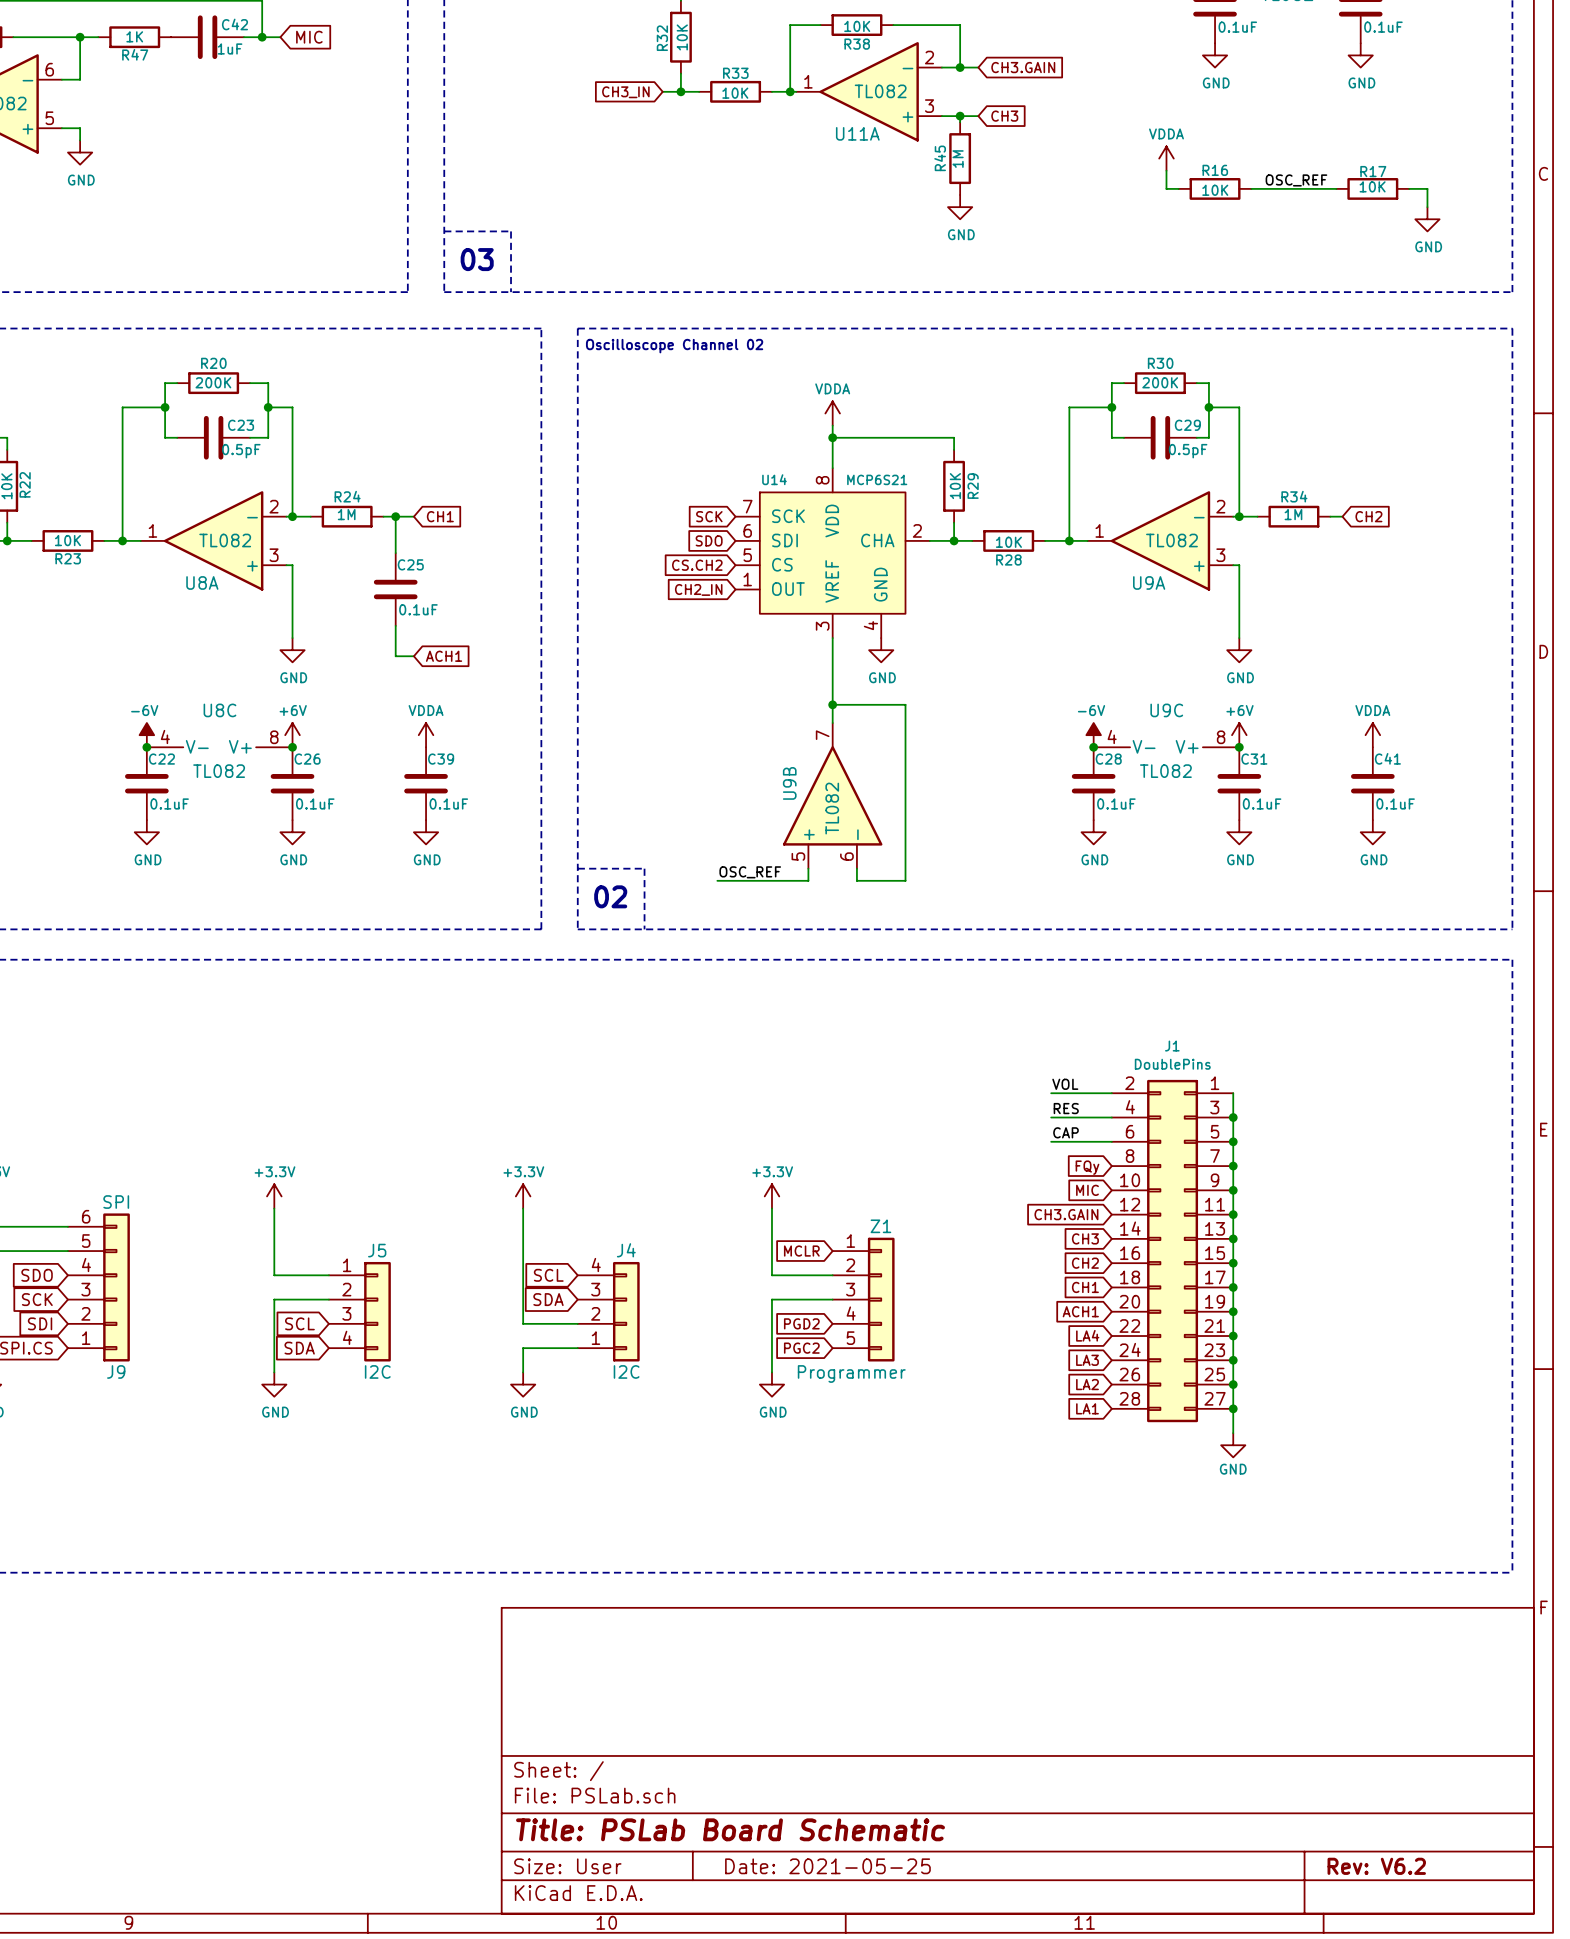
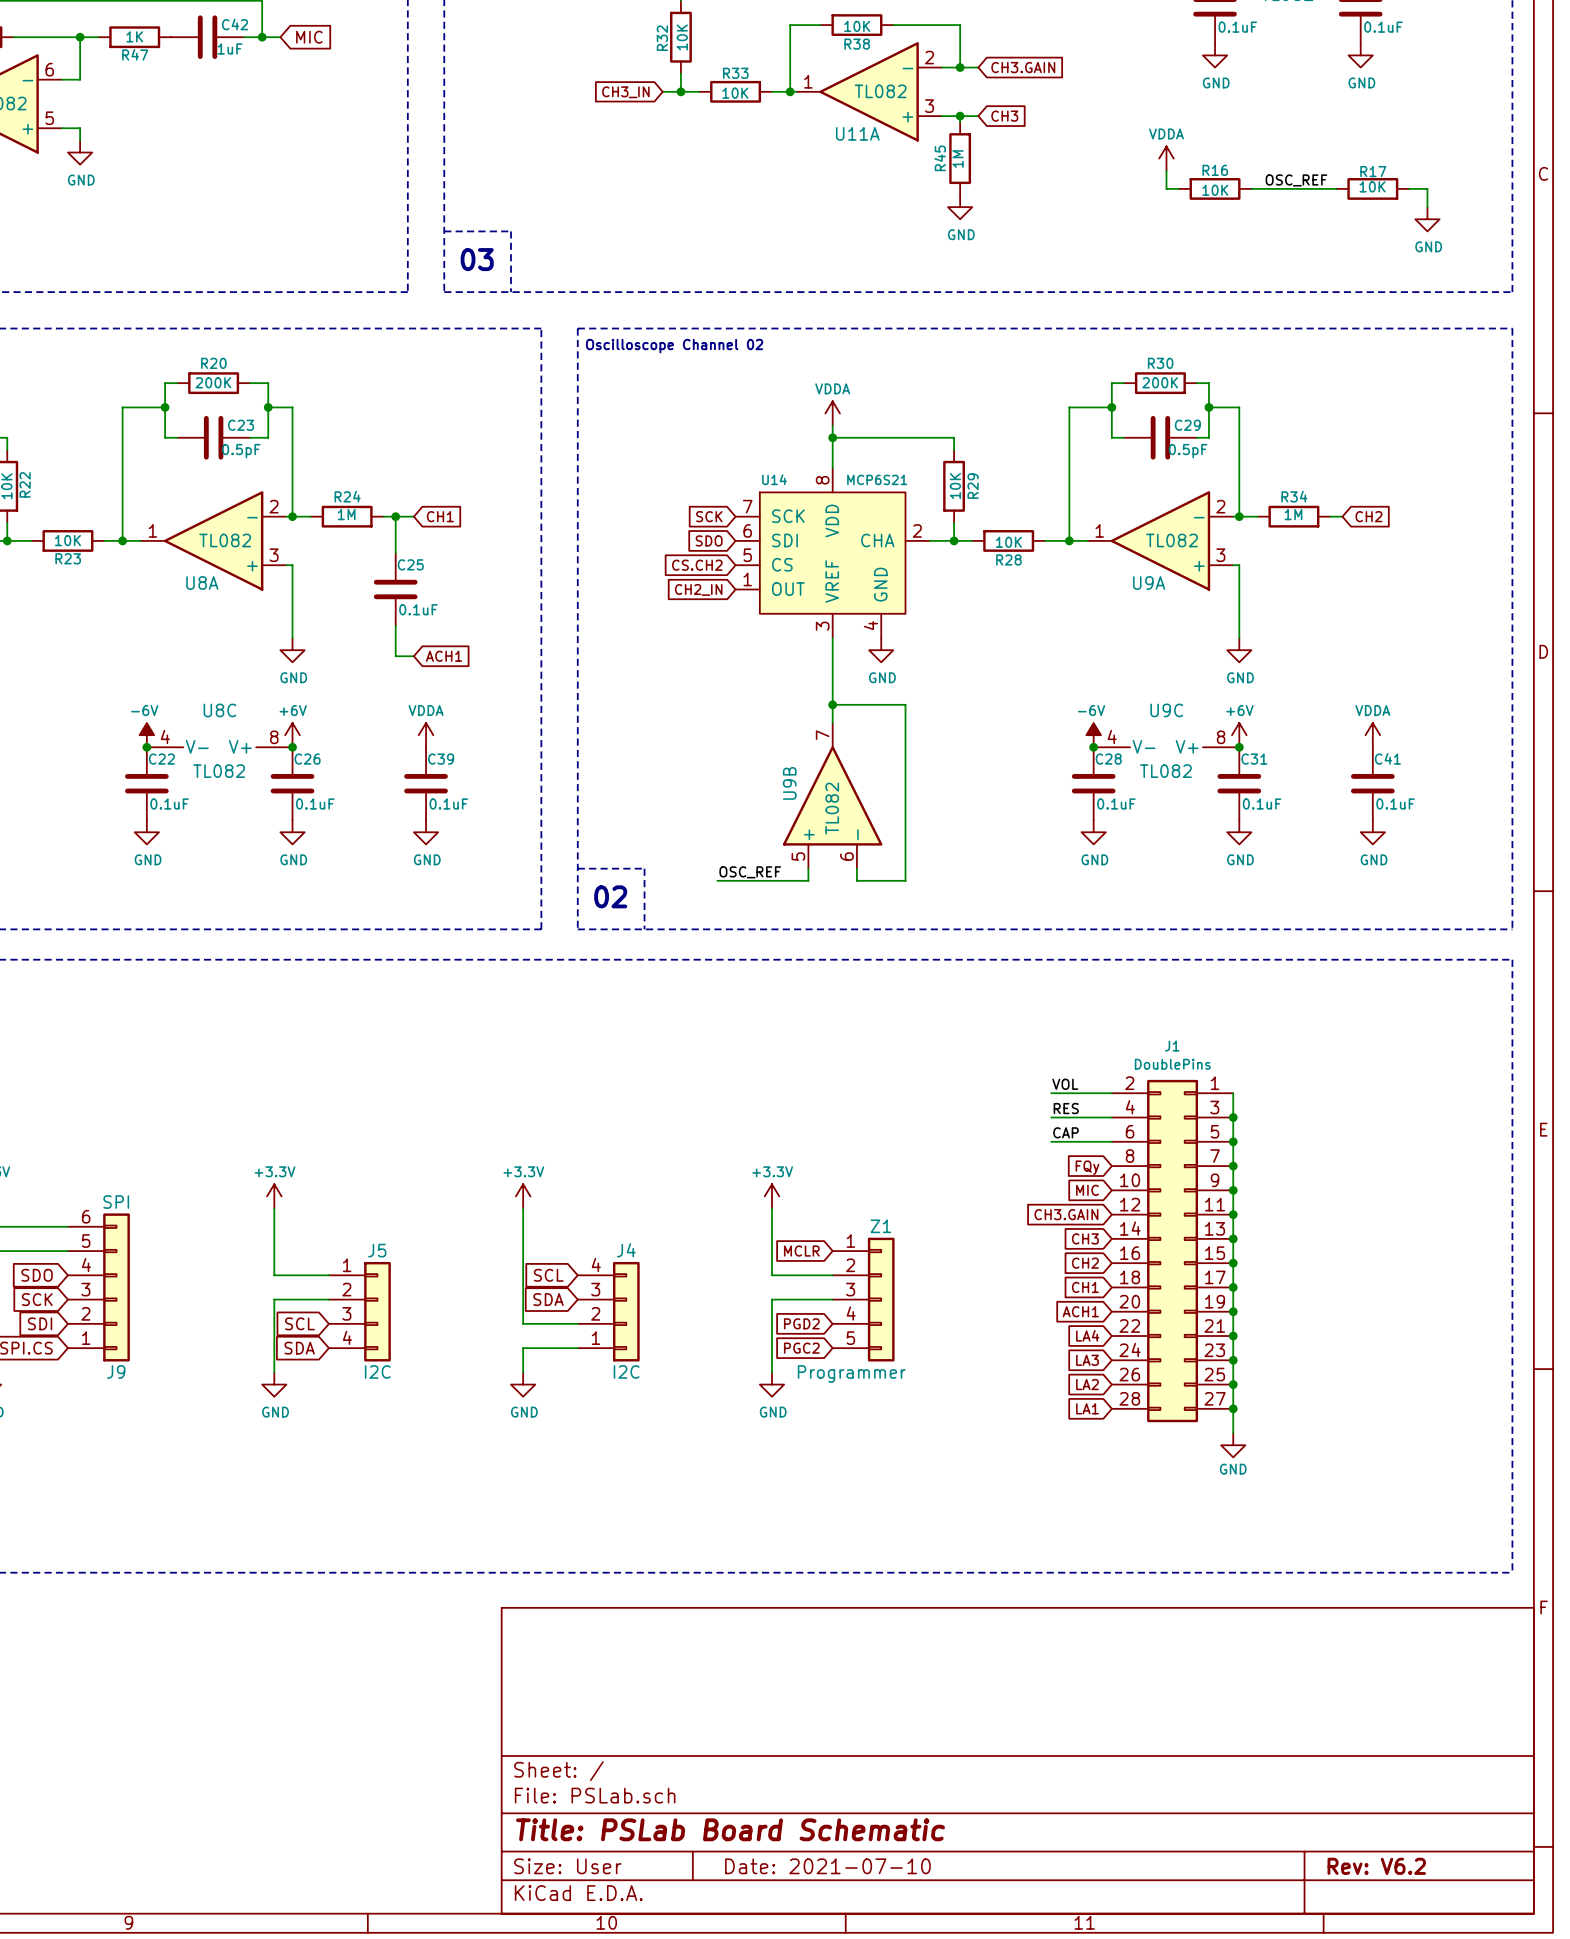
title block: Date: 2021-05-25 (827, 1866) -> Date: 2021-07-10 (827, 1866)

